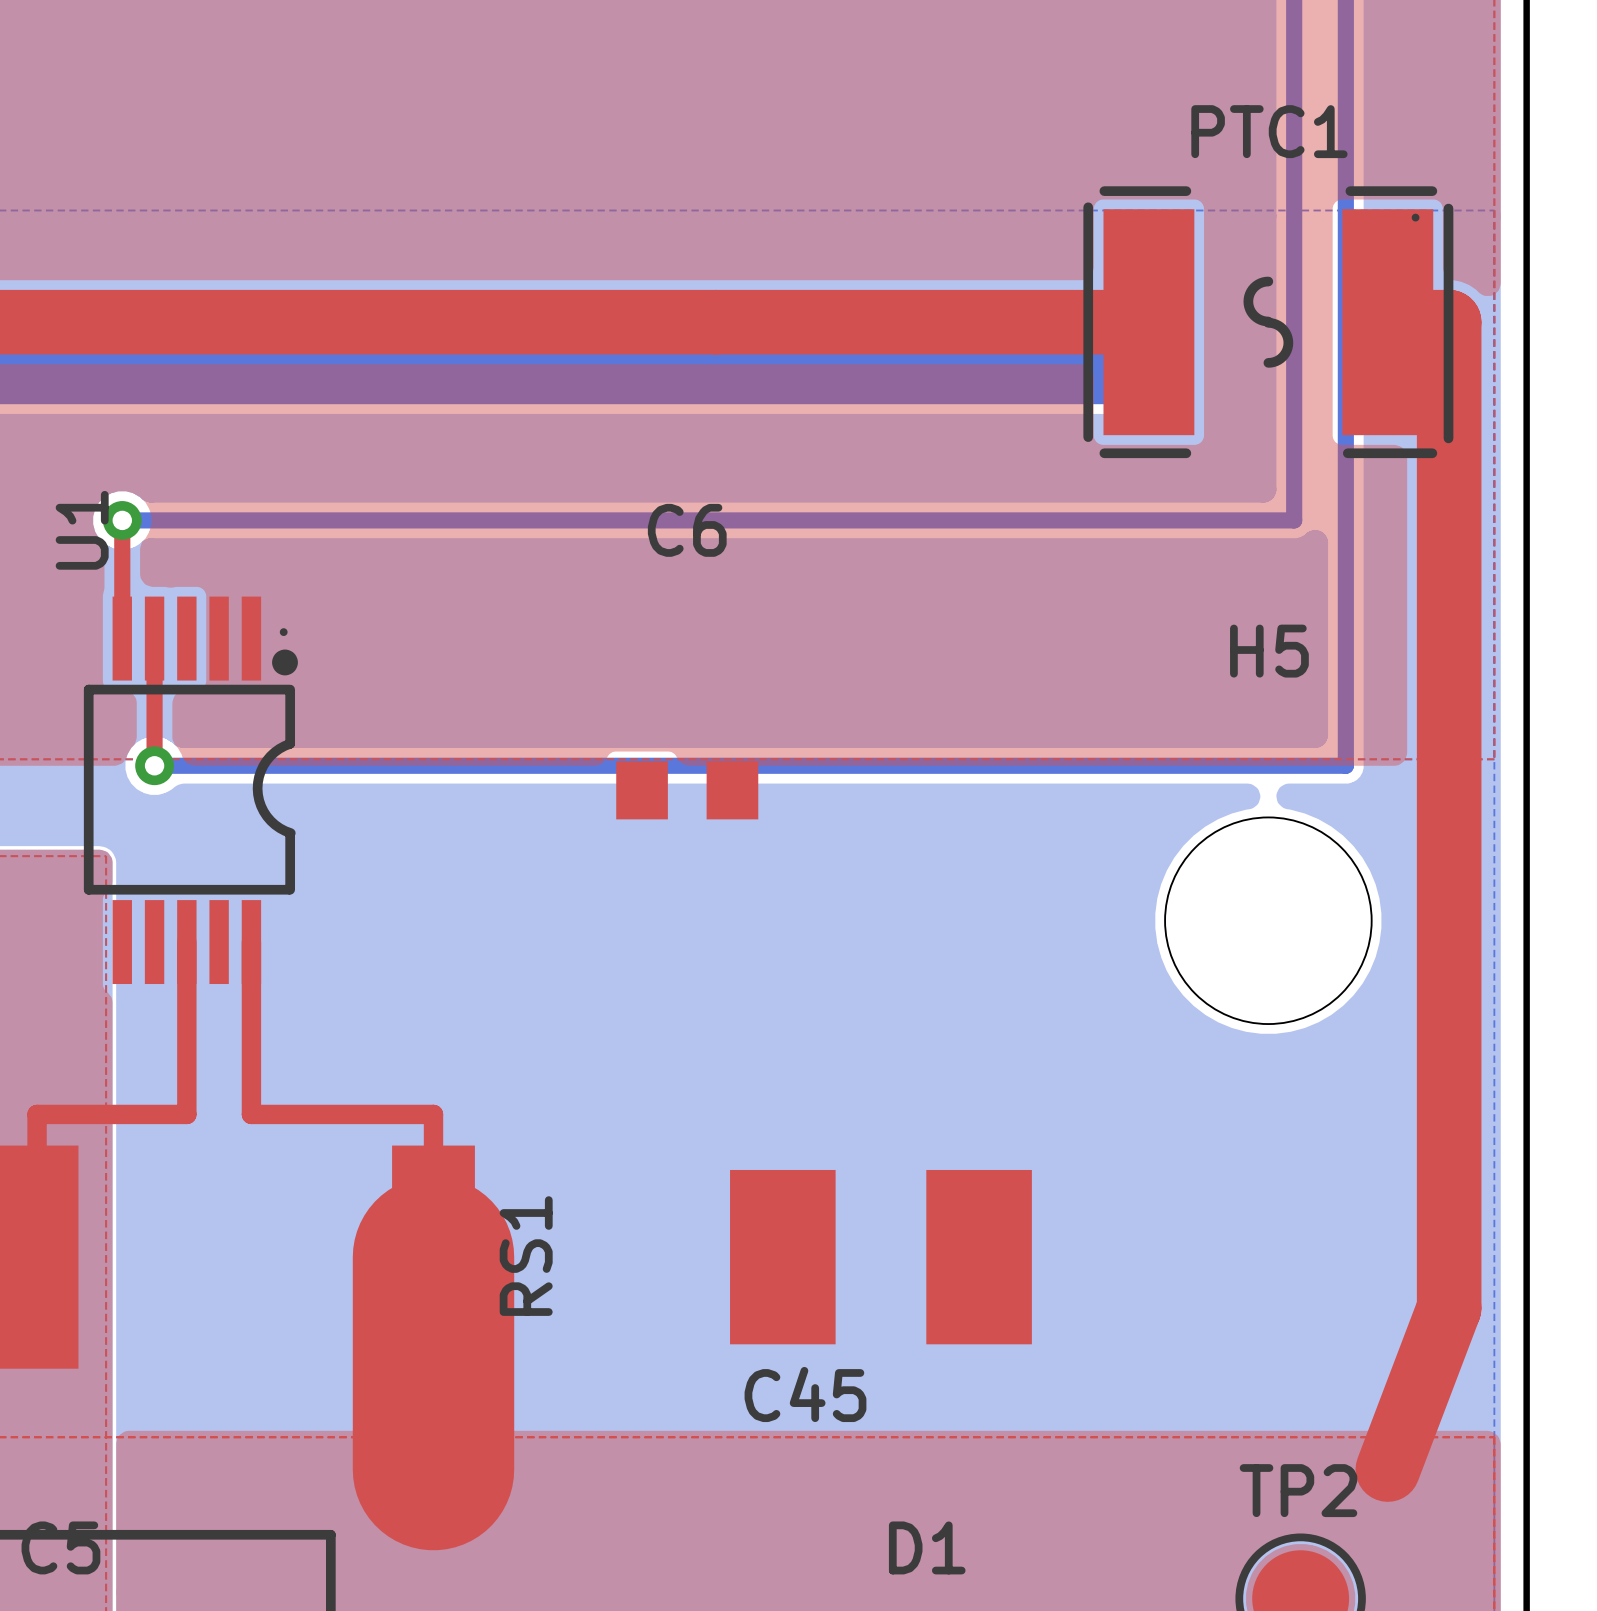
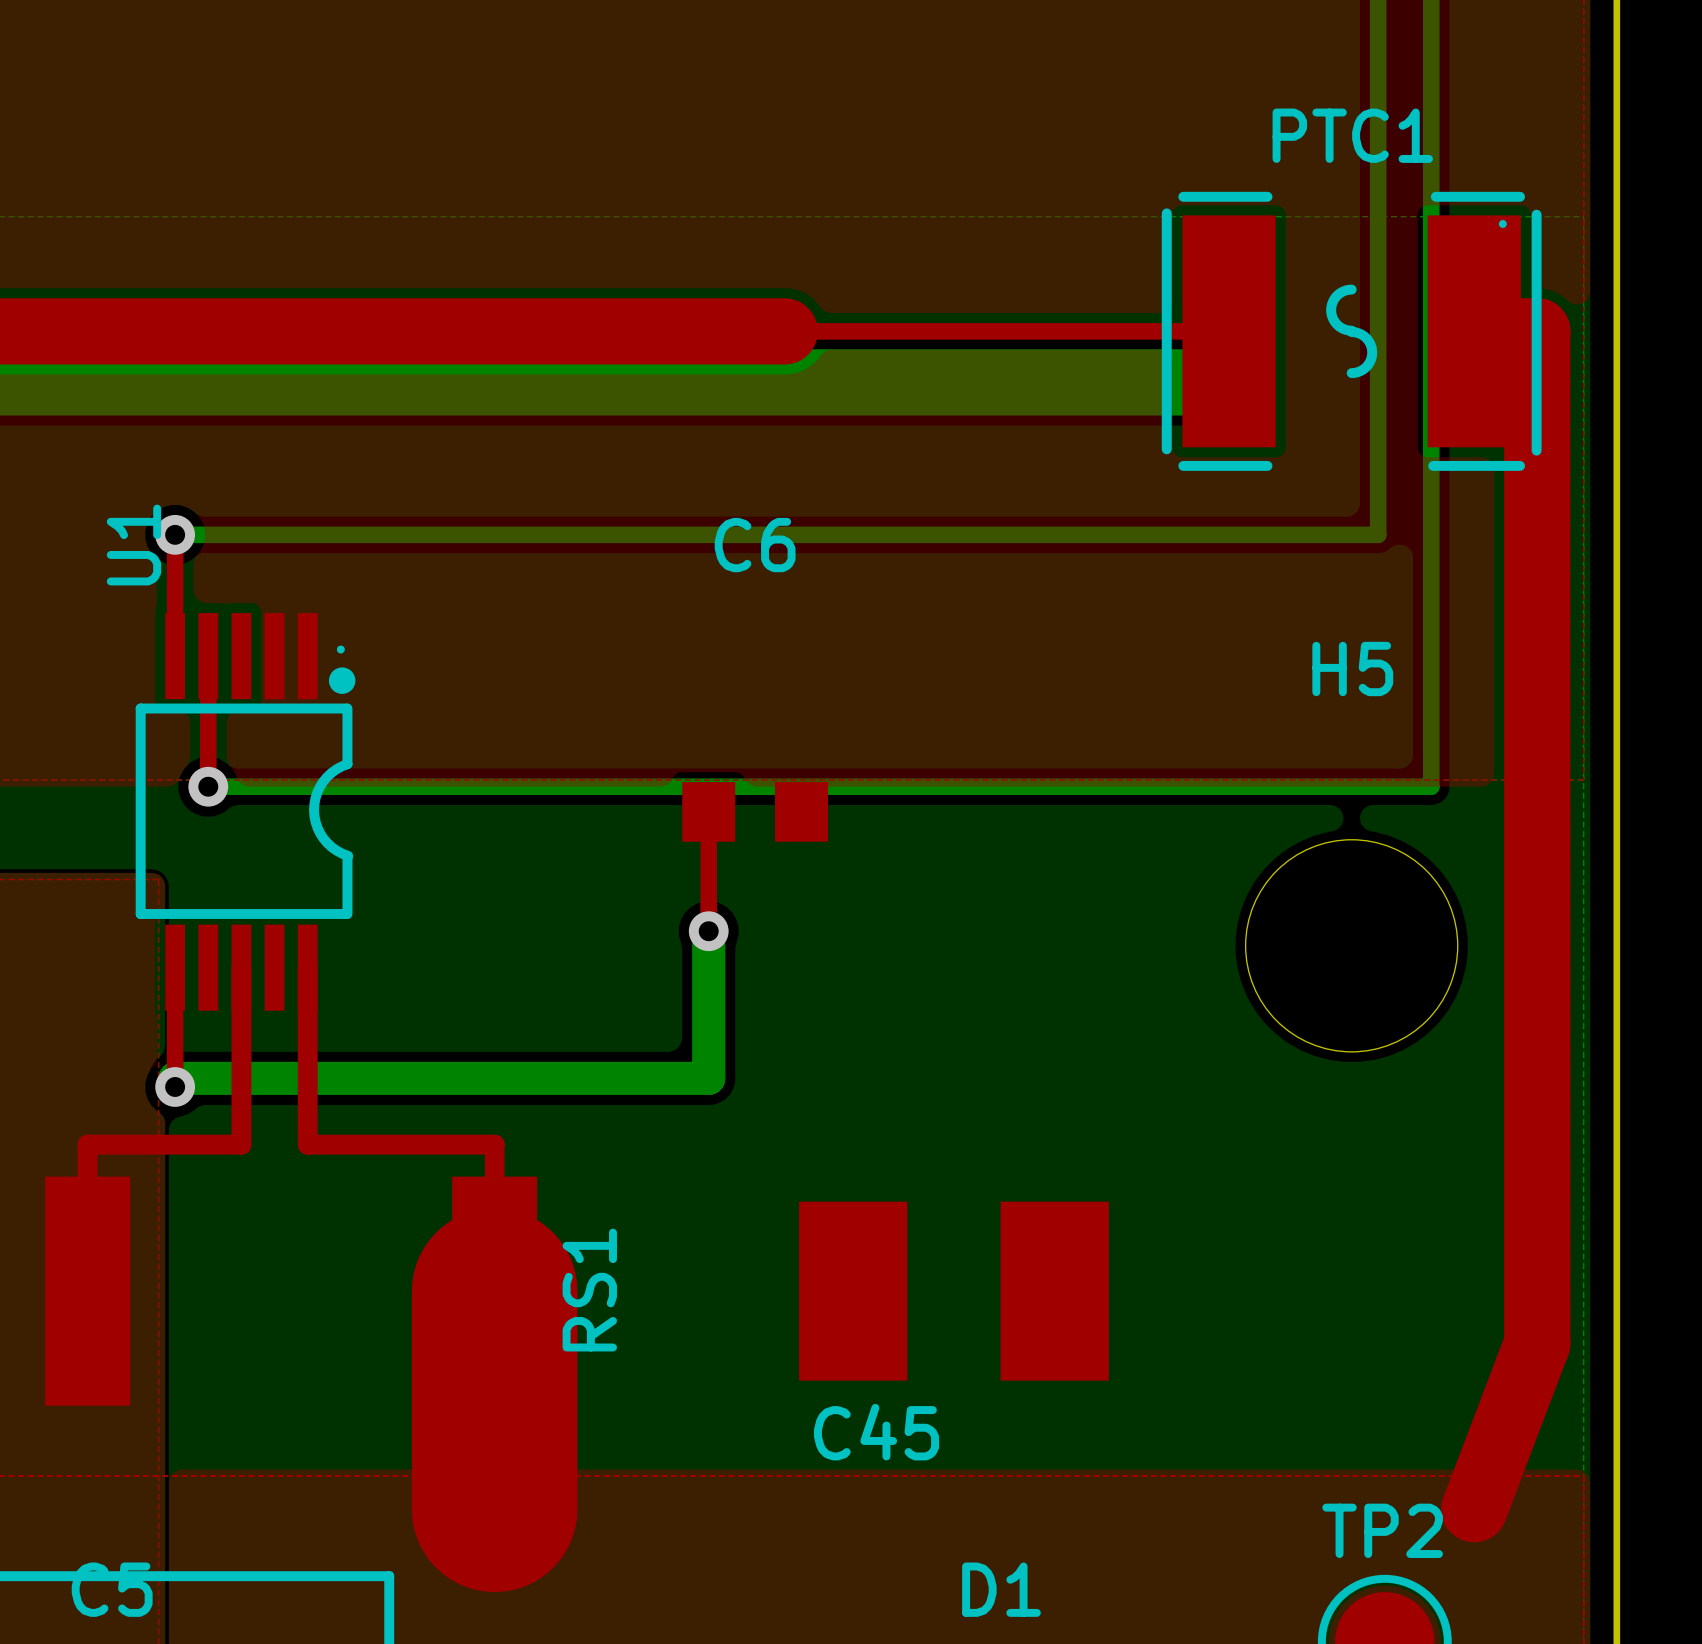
top track width: thick (716, 322) (1148, 322) -> thin (784, 331) (1229, 331)
top track: none -> (708, 811) (708, 931)
bottom track: none -> (708, 931) (708, 1078) (175, 1078) (175, 1086)
via: none -> (708, 931)
top track: none -> (175, 967) (175, 1086)
via: none -> (175, 1086)

